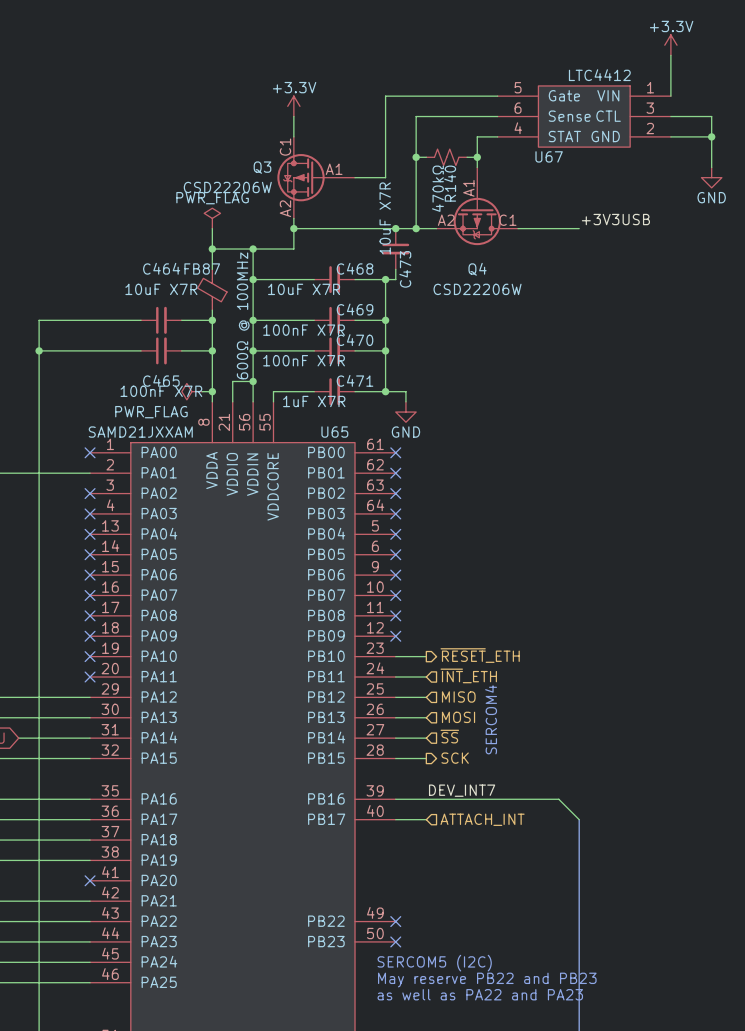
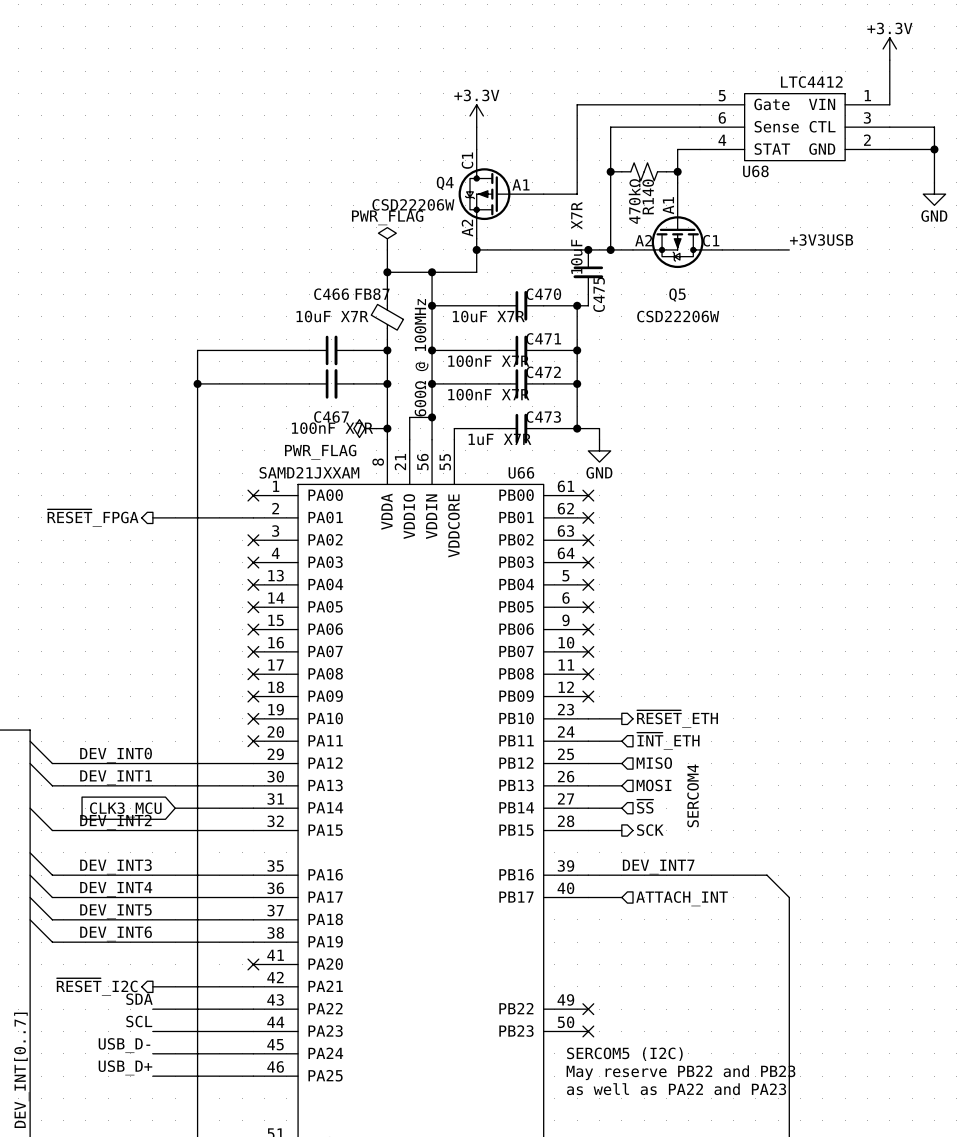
U67 name: U67 (549, 156) -> U68 (755, 171)
Q3 name: Q3 (262, 167) -> Q4 (445, 183)
C464 name: C464 (161, 268) -> C466 (331, 294)
C468 name: C468 (355, 268) -> C470 (543, 294)
C473 name: C473 (405, 269) -> C475 (599, 294)
Q4 name: Q4 (477, 269) -> Q5 (677, 295)
C469 name: C469 (355, 309) -> C471 (543, 338)
C470 name: C470 (355, 340) -> C472 (543, 372)
C465 name: C465 (161, 380) -> C467 (331, 417)
C471 name: C471 (355, 380) -> C473 (543, 417)
U65 name: U65 (334, 432) -> U66 (521, 472)

